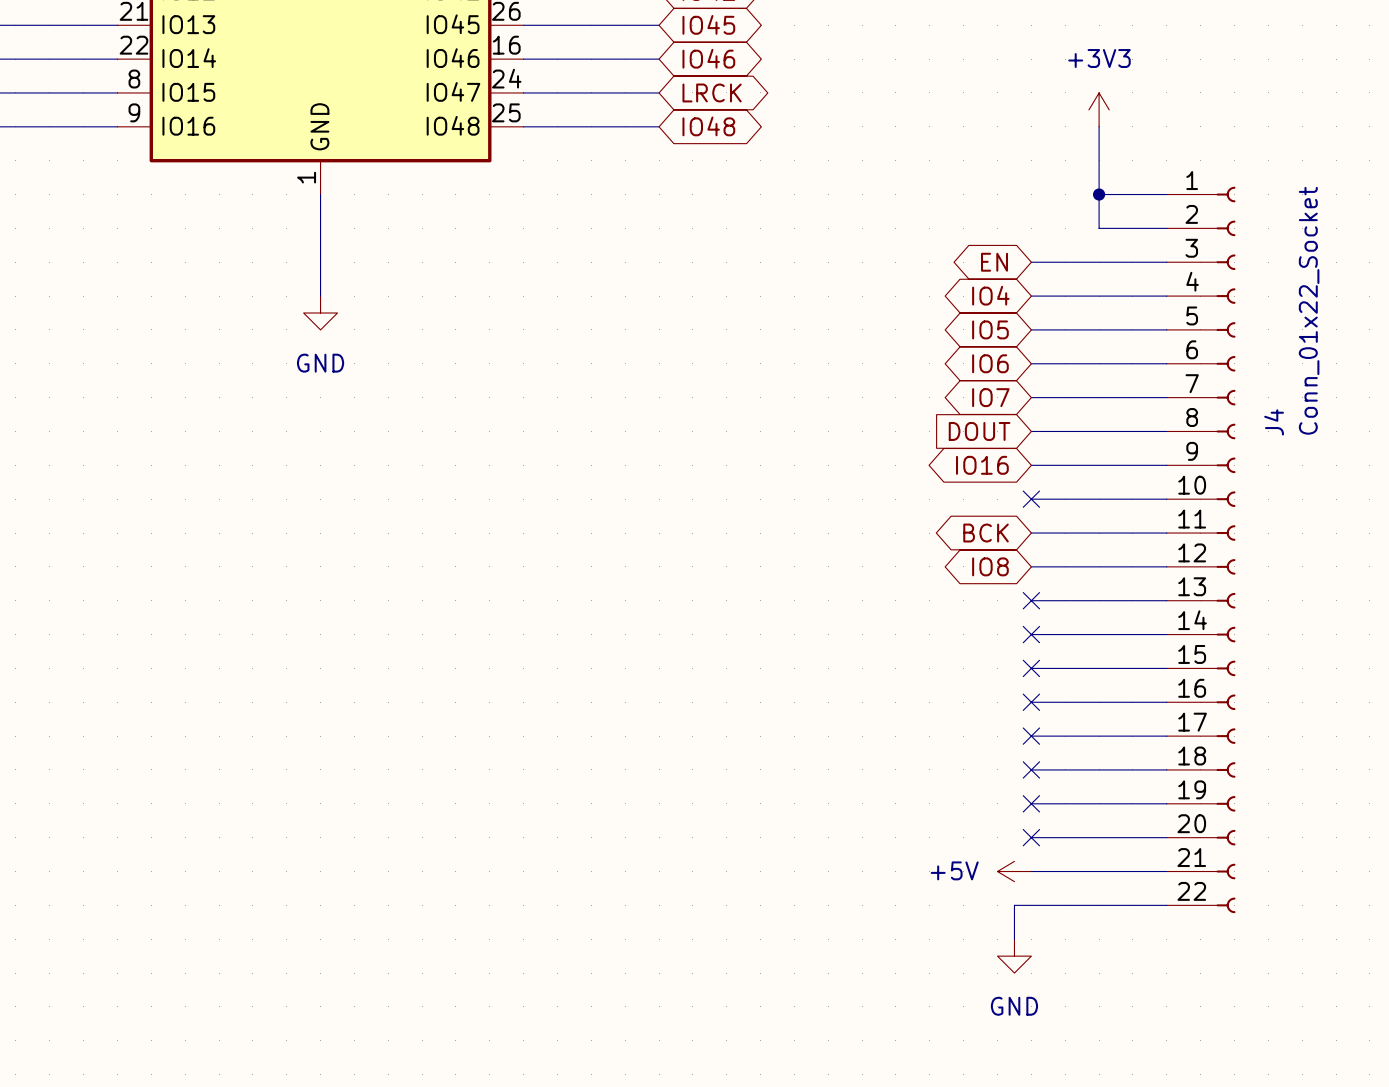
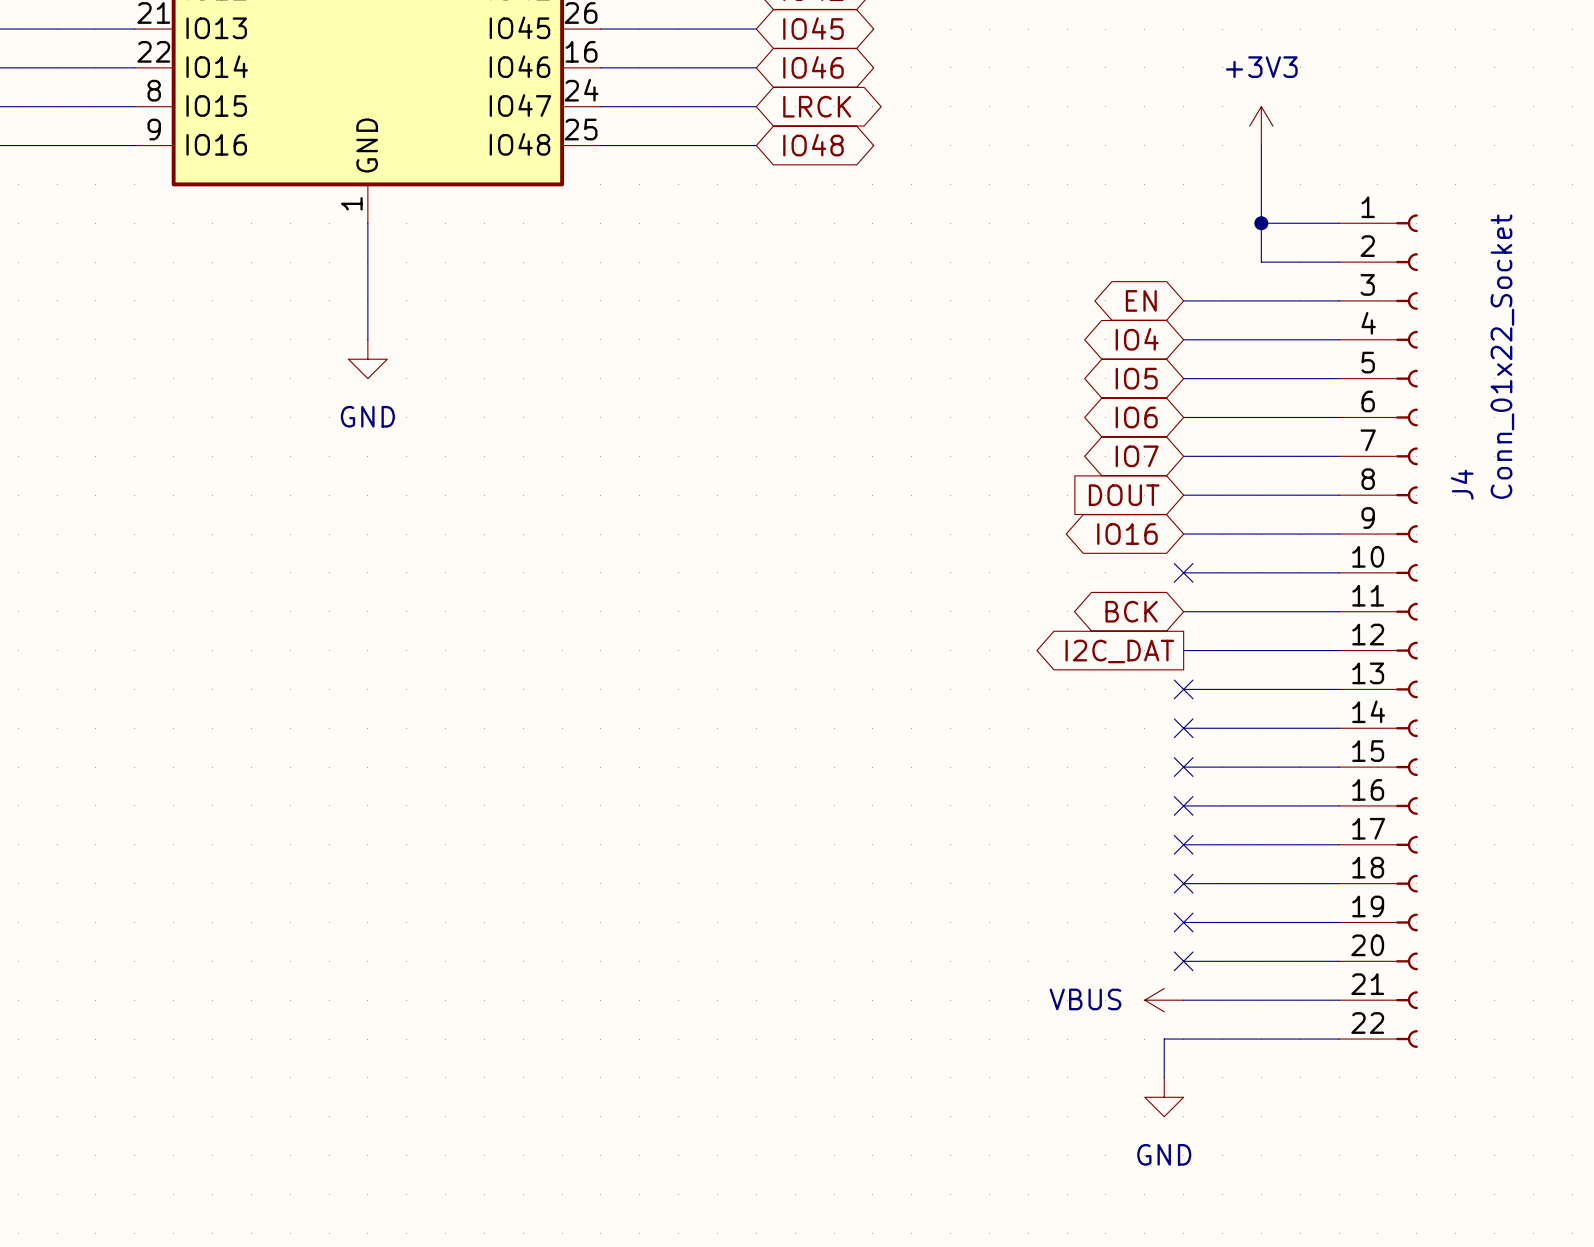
global label shape: bidirectional (990, 566) -> output (1119, 651)
global label: IO8 (990, 566) -> I2C_DAT (1119, 651)
power symbol: +5V (1014, 871) -> VBUS (1164, 1000)

